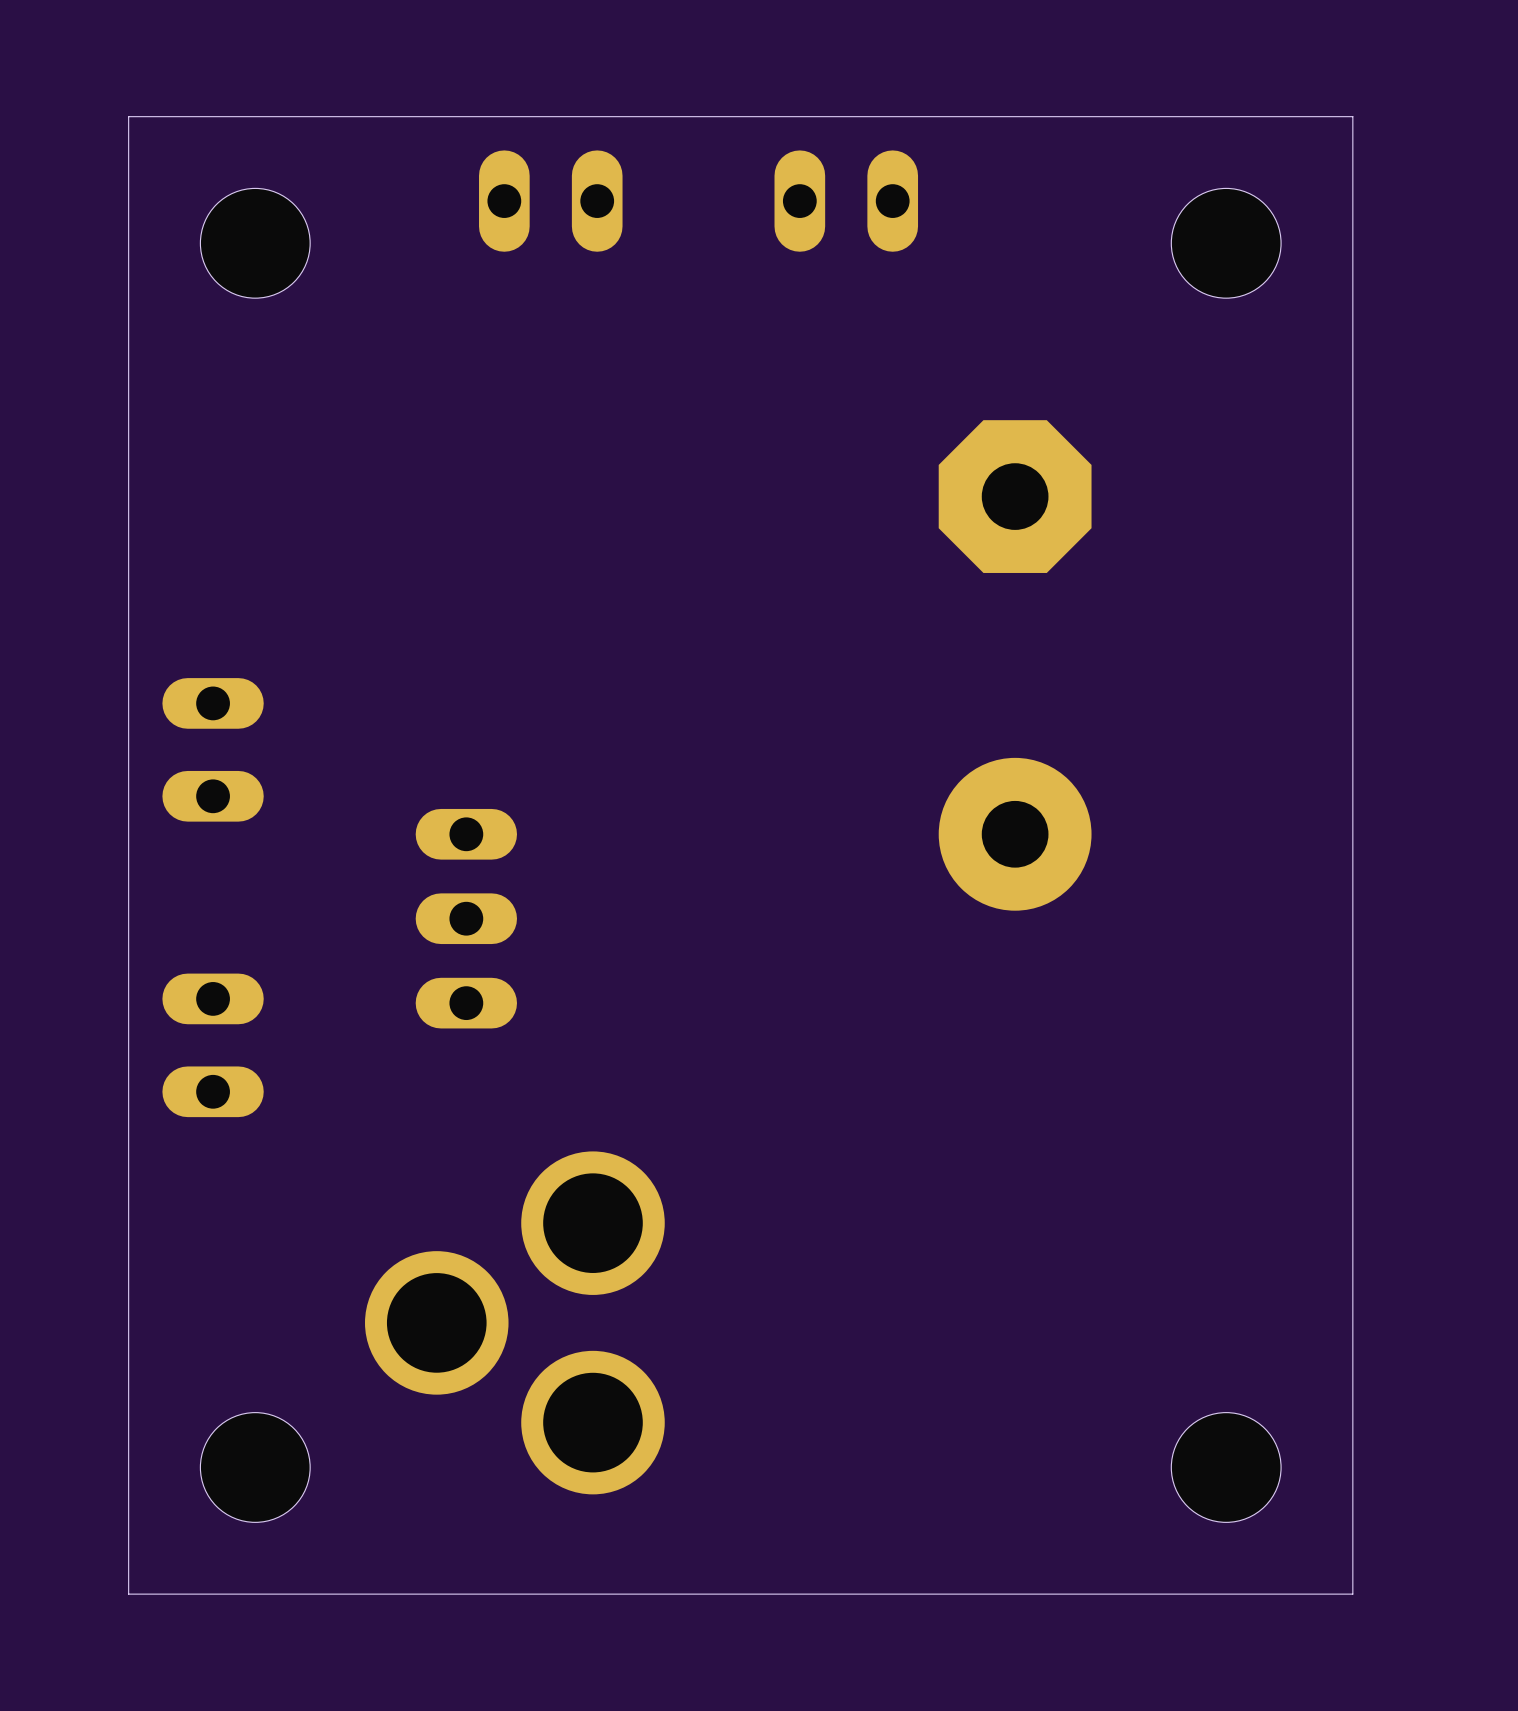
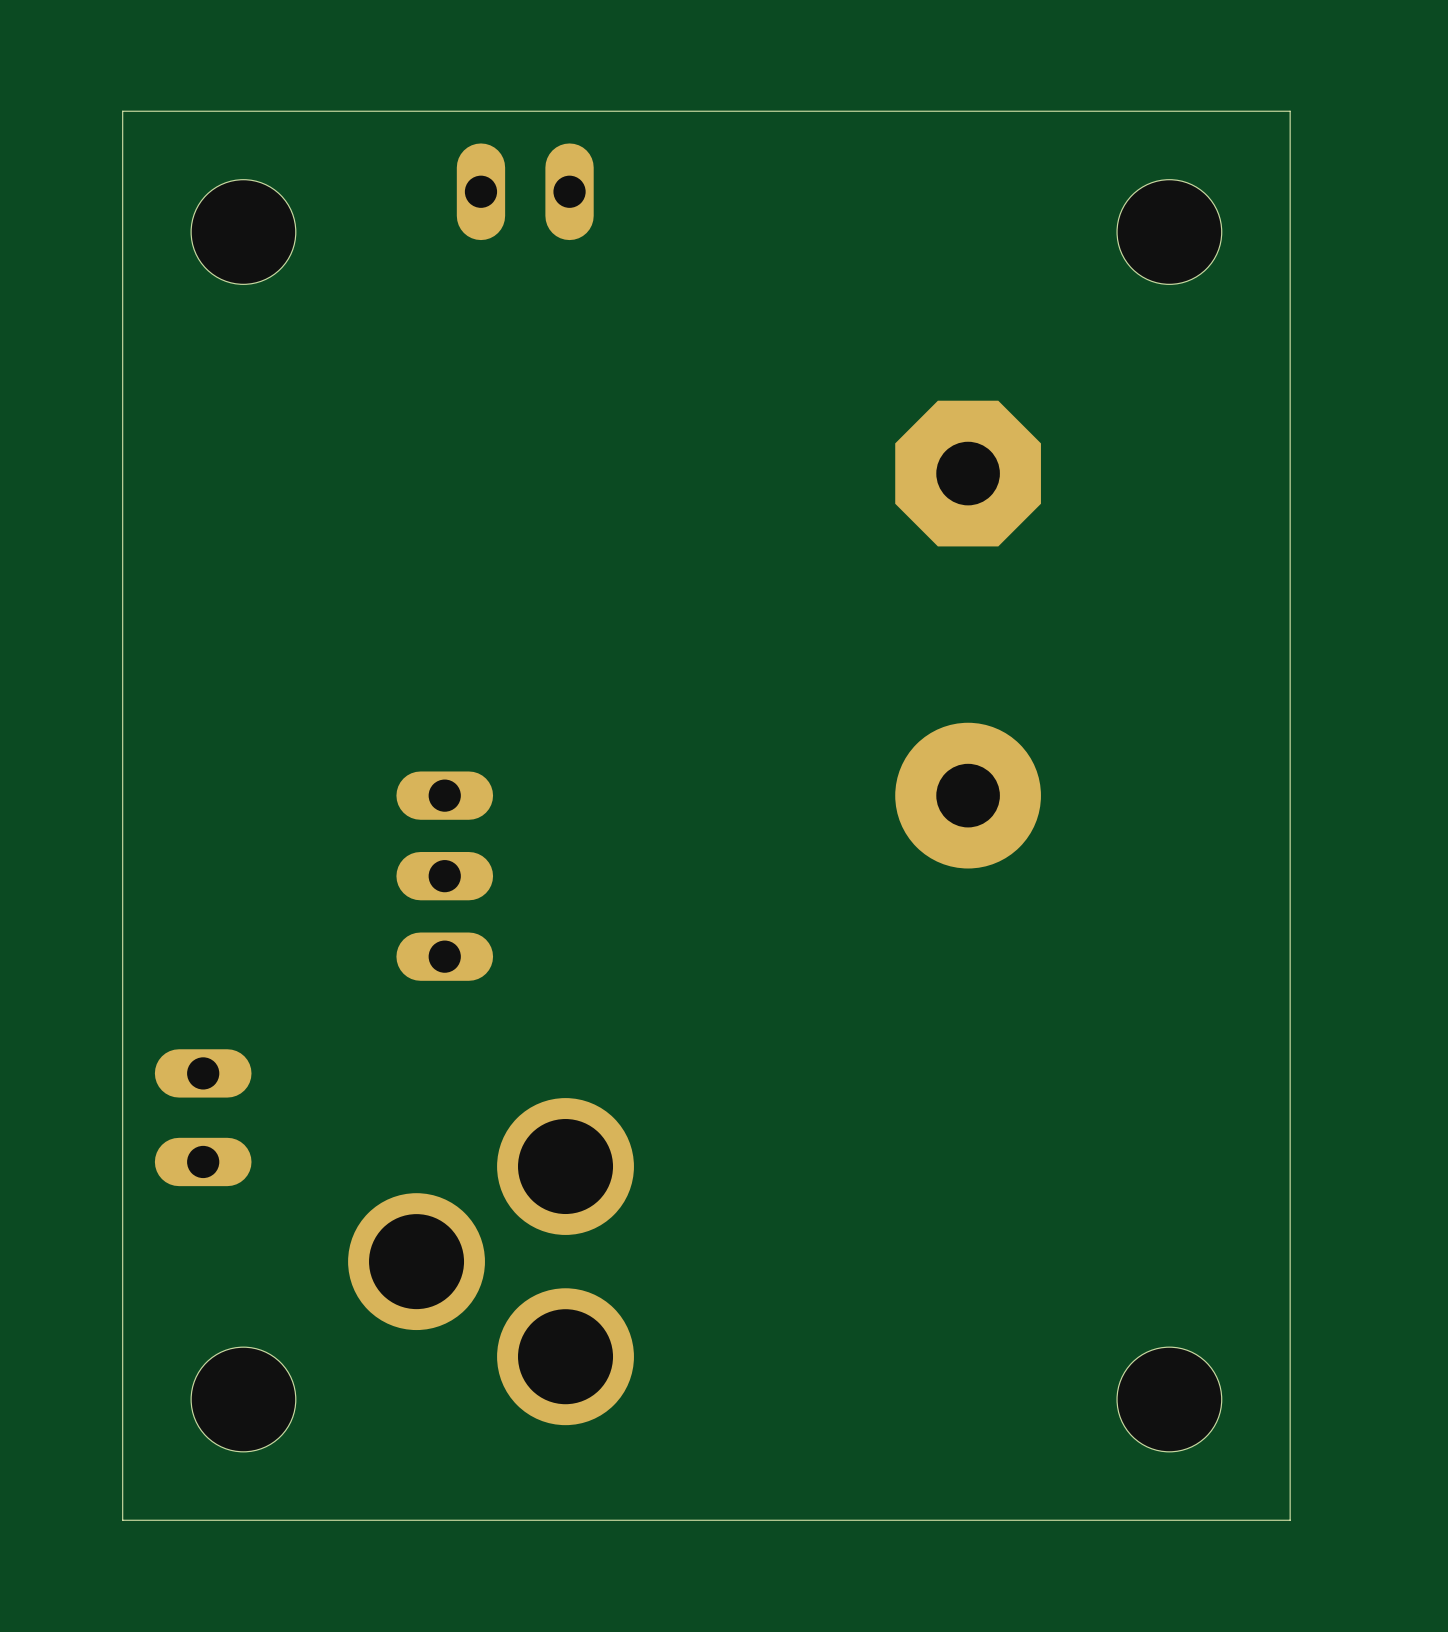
part: (846, 201) -> none
part: (213, 749) -> none
part position: (213, 1045) -> (203, 1117)

